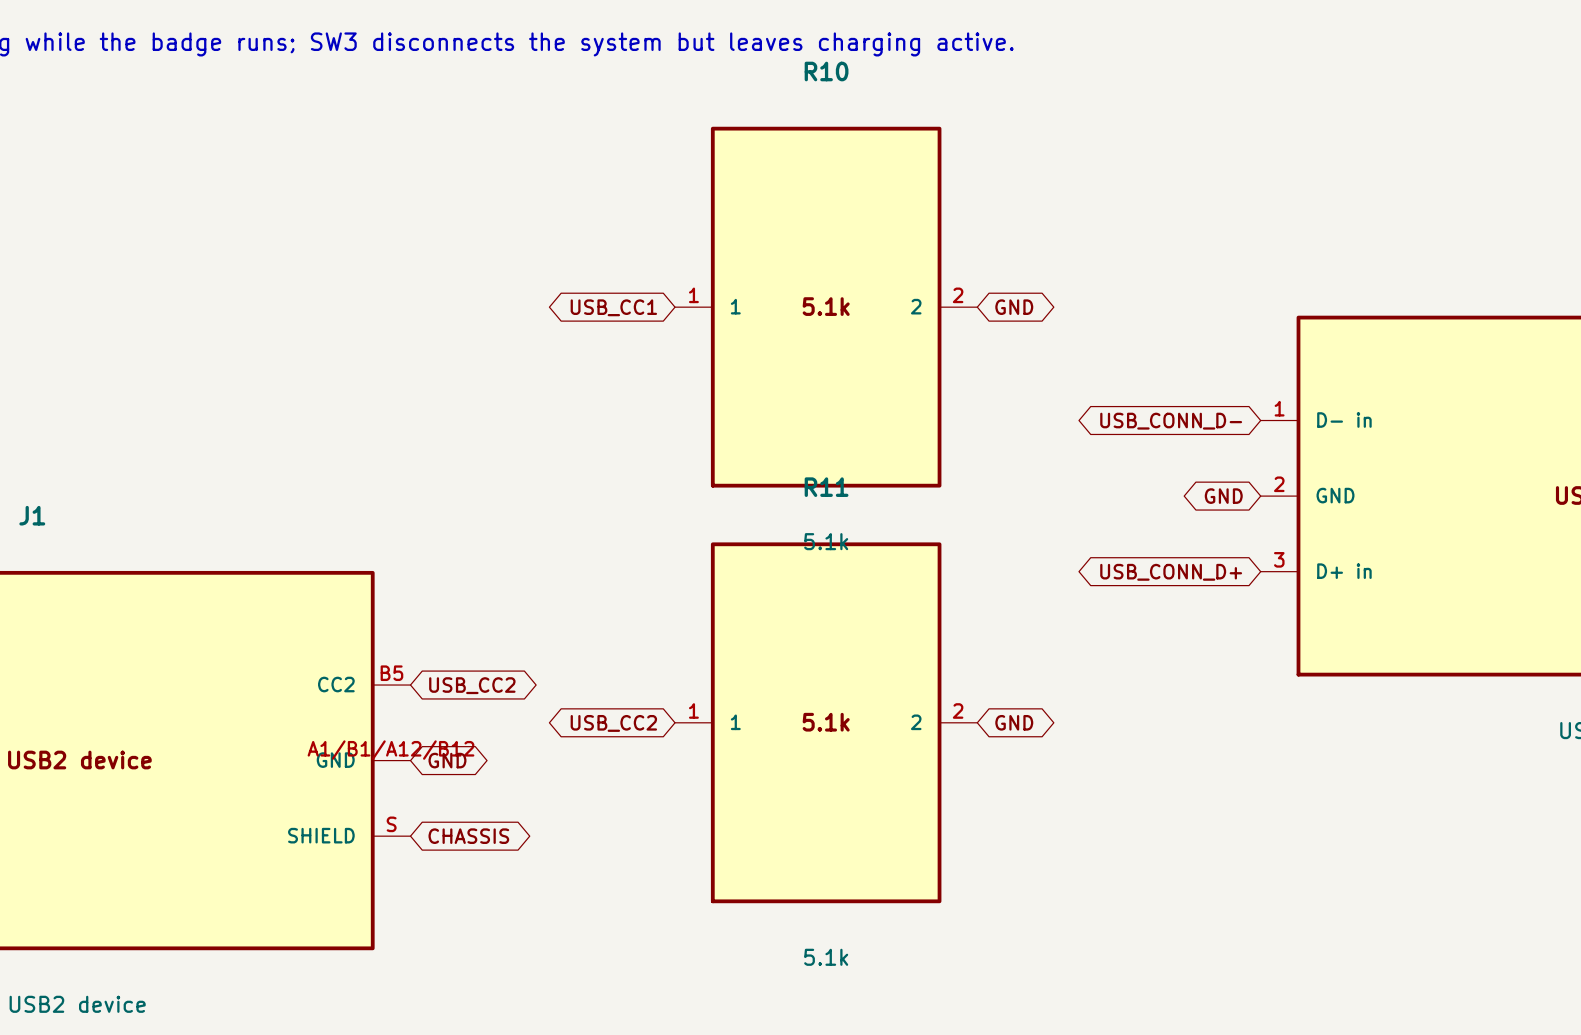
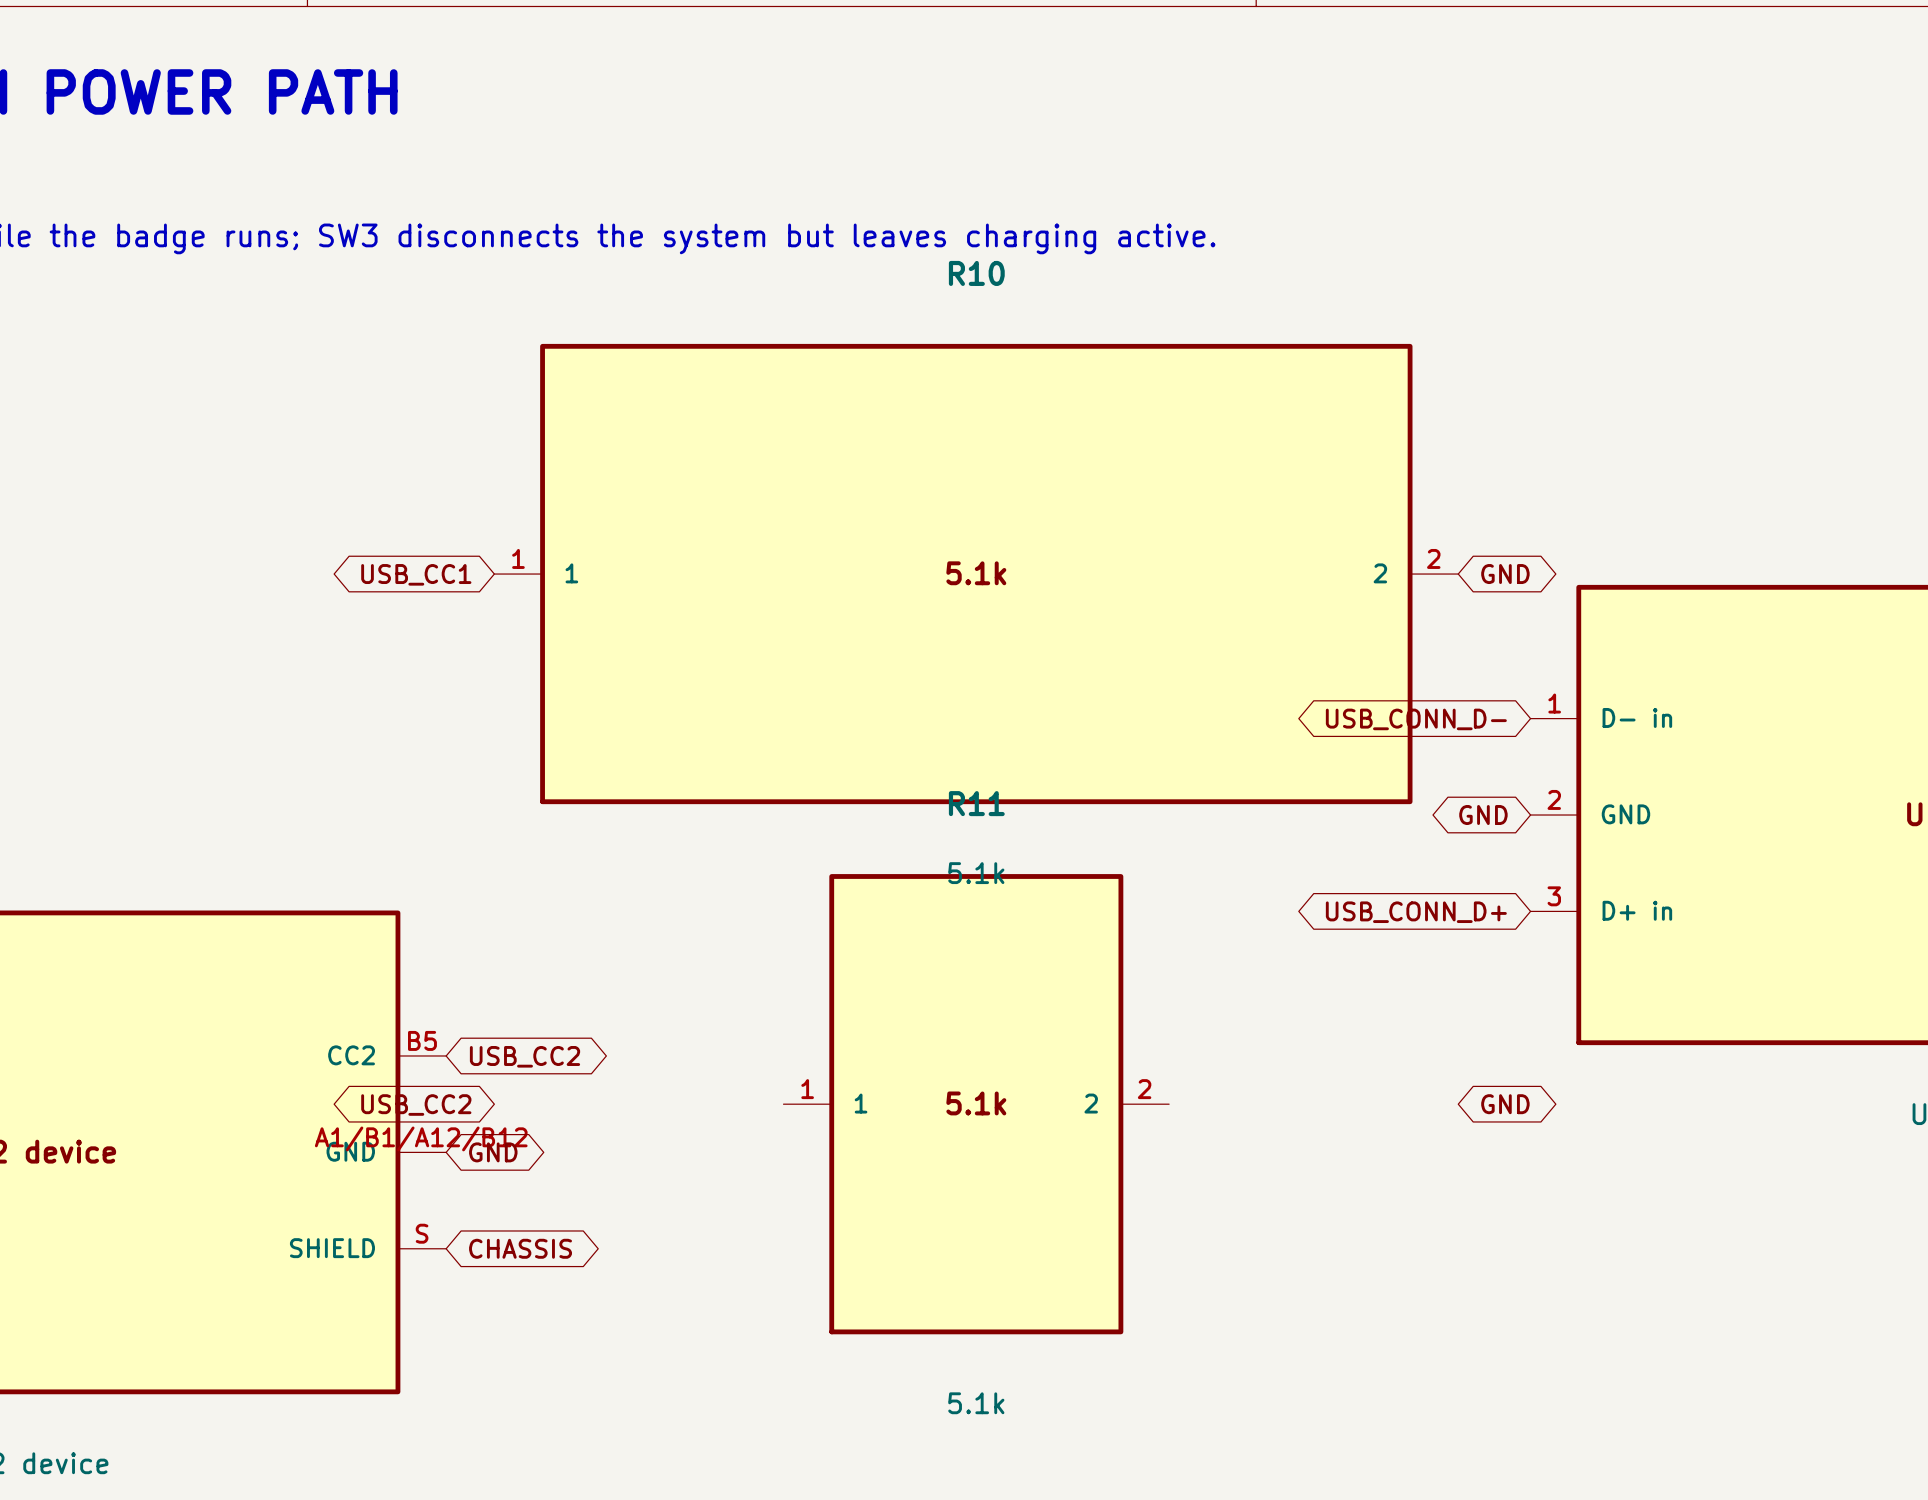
R10 symbol: [675, 126, 978, 488] -> [494, 343, 1459, 805]
global label position: USB_CC1 (613, 307) -> USB_CC1 (416, 574)
global label position: GND (1014, 307) -> GND (1505, 574)
global label position: GND (1014, 722) -> GND (1505, 1104)
global label position: USB_CC2 (613, 723) -> USB_CC2 (416, 1105)

